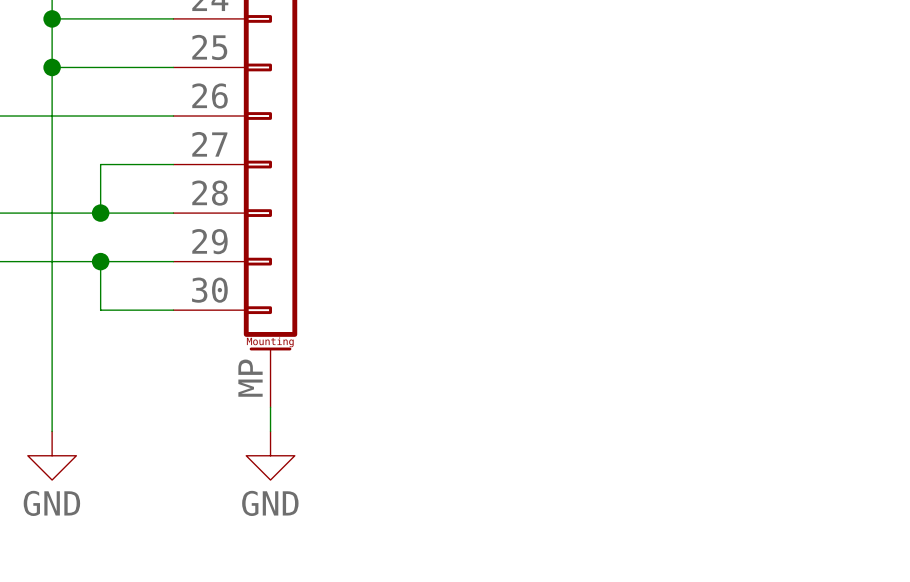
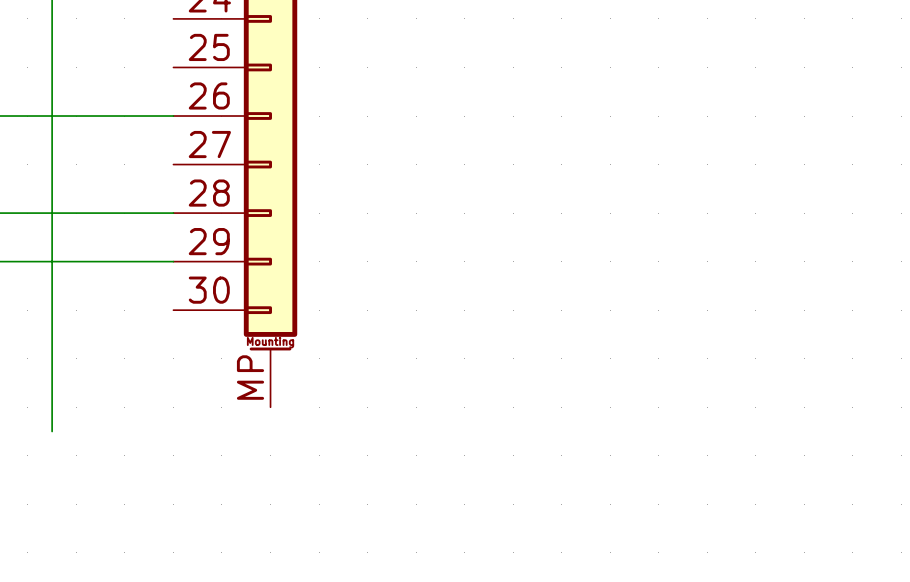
wire: (52, 18) (173, 18) -> none
junction: (52, 18) -> none
wire: (52, 67) (173, 67) -> none
junction: (52, 67) -> none
wire: (173, 164) (100, 164) (100, 213) -> none
junction: (100, 213) -> none
wire: (100, 261) (100, 310) (173, 310) -> none
junction: (100, 261) -> none
wire: (270, 407) (270, 431) -> none
power symbol: GND (52, 455) -> none
power symbol: GND (270, 455) -> none

